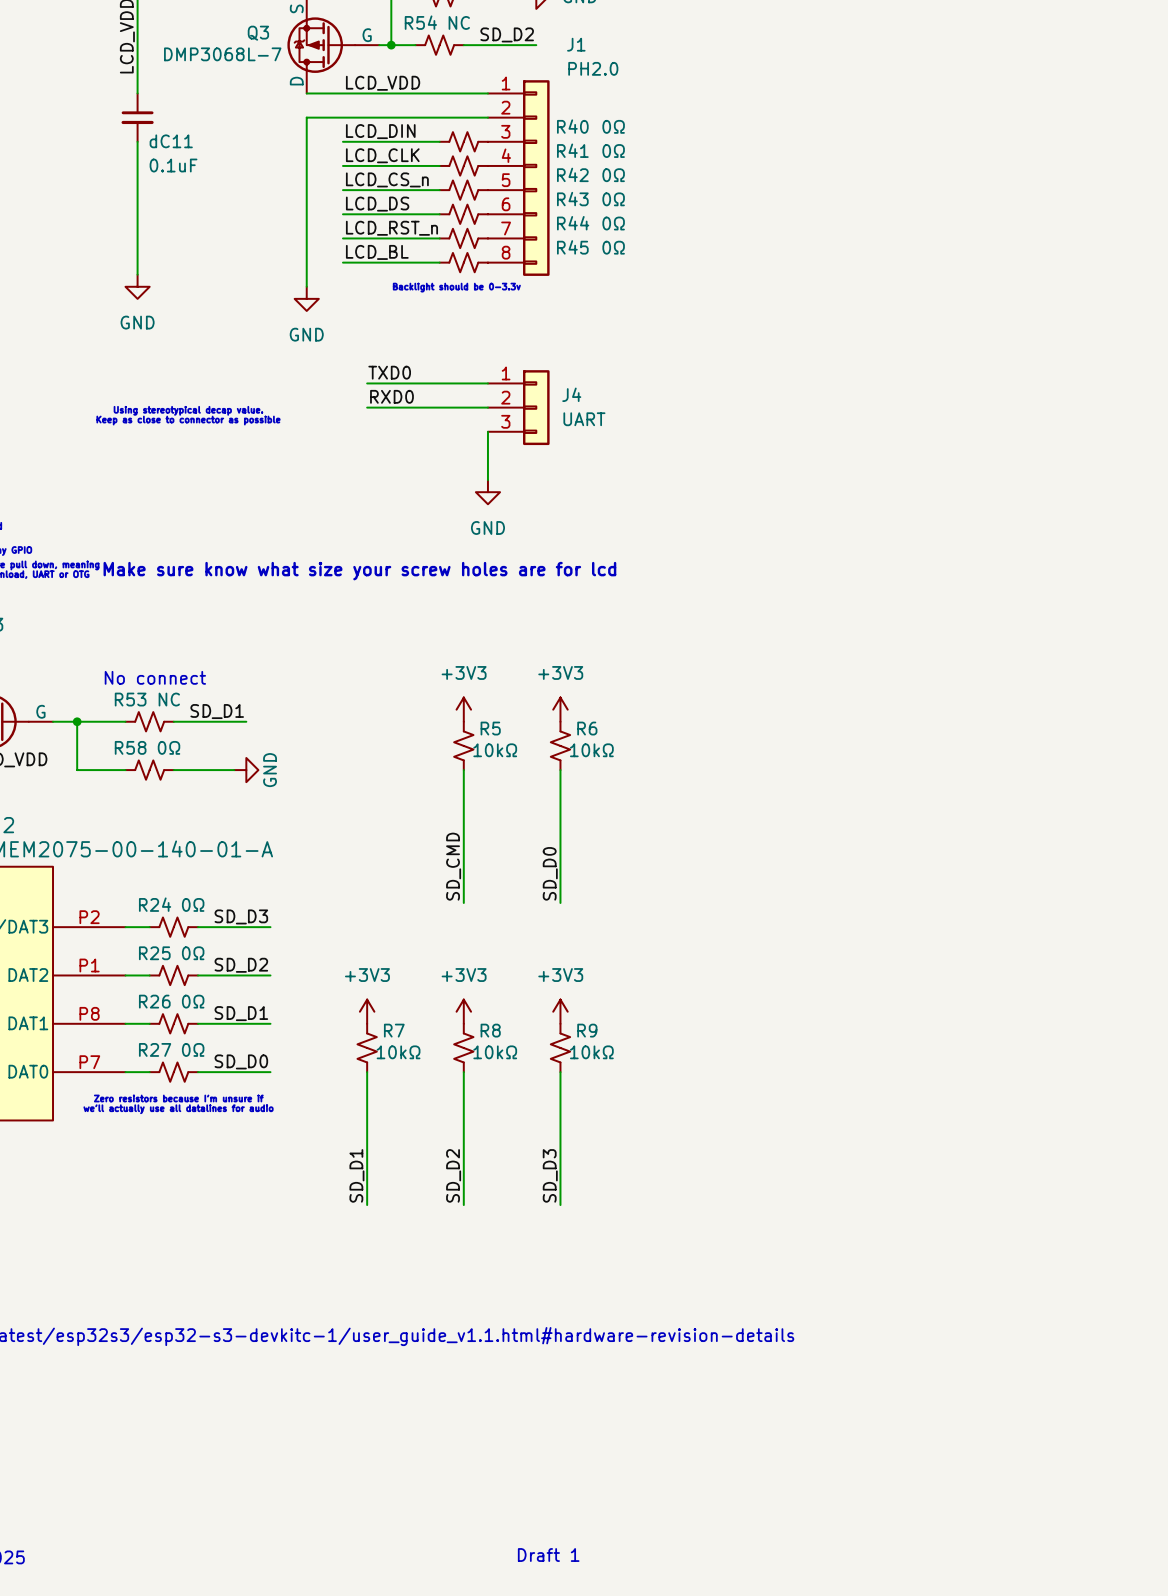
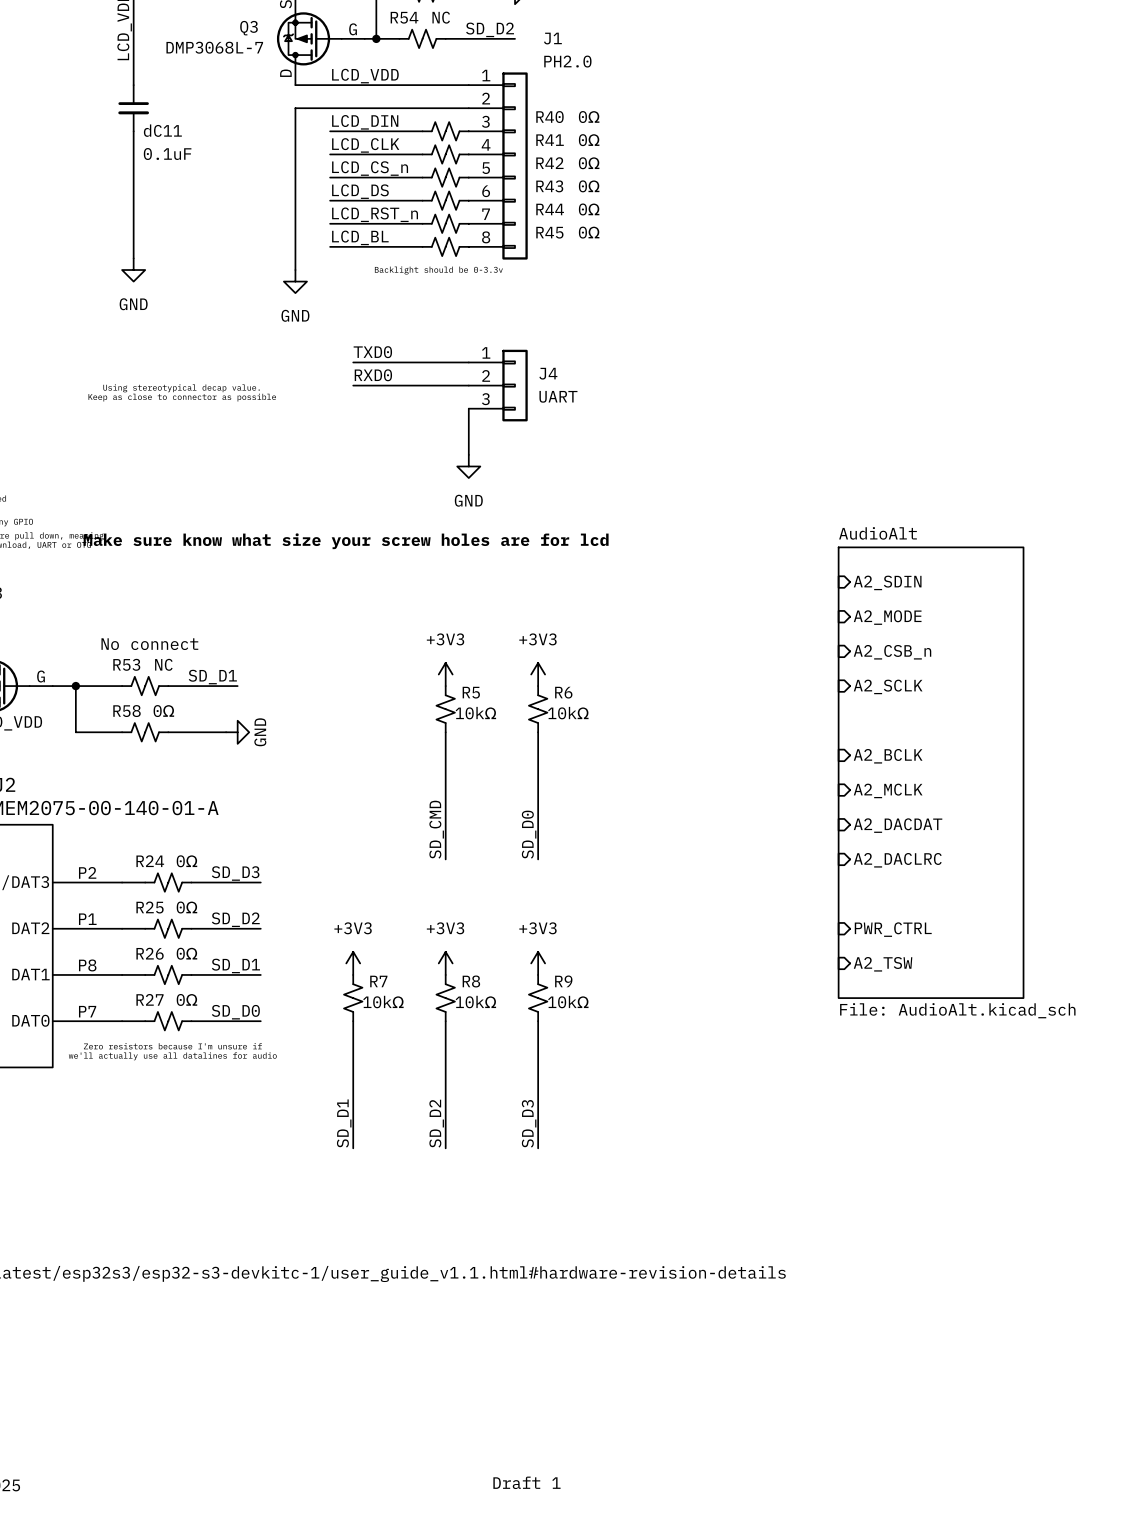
sheet pin: none -> A2_SDIN (887, 582)
sheet pin: none -> A2_MODE (887, 617)
sheet pin: none -> A2_CSB_n (892, 652)
sheet pin: none -> A2_SCLK (888, 686)
sheet pin: none -> A2_BCLK (888, 756)
sheet AudioAlt: none -> File: AudioAlt.kicad_sch (931, 772)
sheet pin: none -> A2_MCLK (888, 790)
sheet pin: none -> A2_DACDAT (898, 825)
sheet pin: none -> A2_DACLRC (897, 860)
sheet pin: none -> PWR_CTRL (893, 929)
sheet pin: none -> A2_TSW (883, 964)

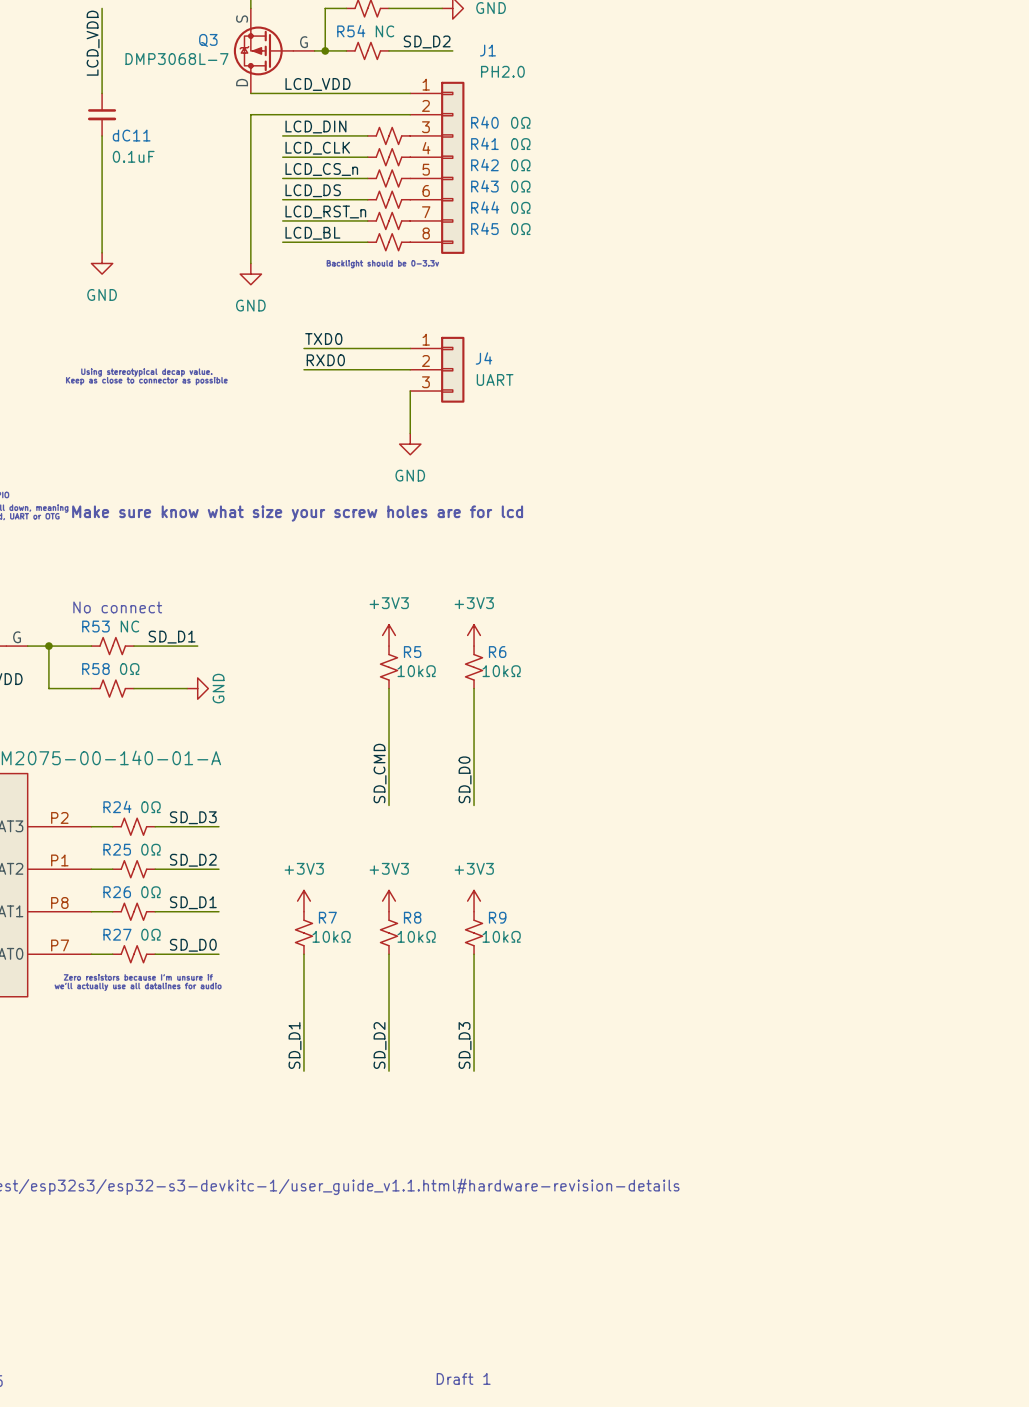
sheet pin: A2_SDIN (887, 582) -> none
sheet pin: A2_MODE (887, 617) -> none
sheet pin: A2_CSB_n (892, 652) -> none
sheet pin: A2_SCLK (888, 686) -> none
sheet pin: A2_BCLK (888, 756) -> none
sheet AudioAlt: File: AudioAlt.kicad_sch (931, 772) -> none
sheet pin: A2_MCLK (888, 790) -> none
sheet pin: A2_DACDAT (898, 825) -> none
sheet pin: A2_DACLRC (897, 860) -> none
sheet pin: PWR_CTRL (893, 929) -> none
sheet pin: A2_TSW (883, 964) -> none

